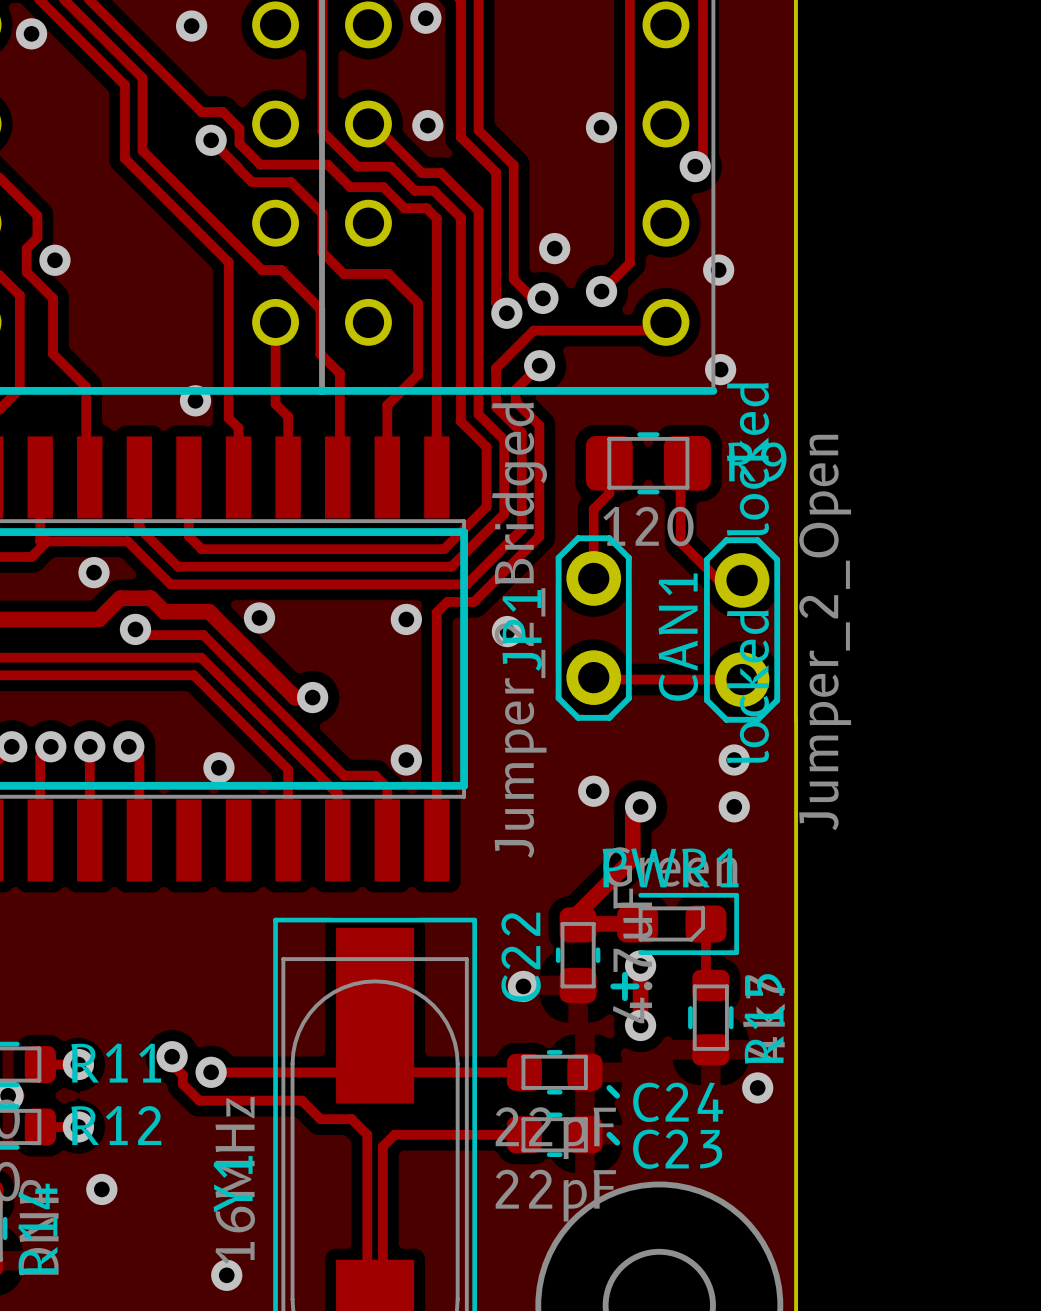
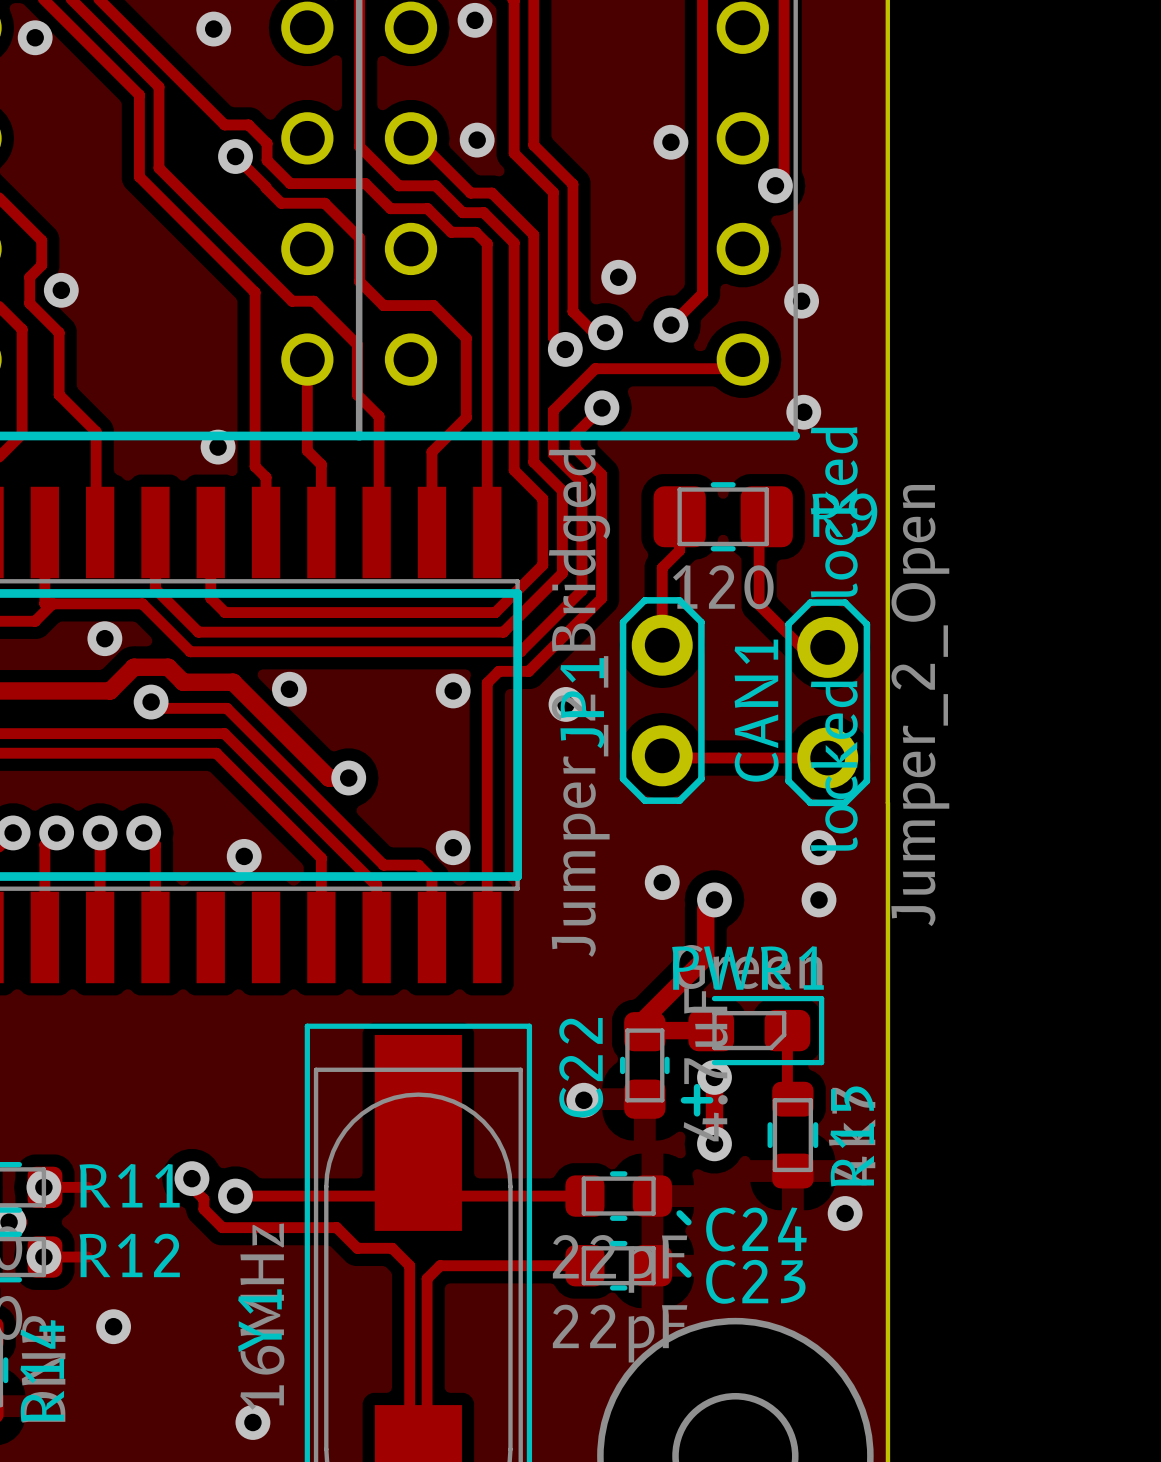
via: none -> (43, 1187)
via: (78, 1064) -> none
via: none -> (43, 1257)
via: (78, 1126) -> none

